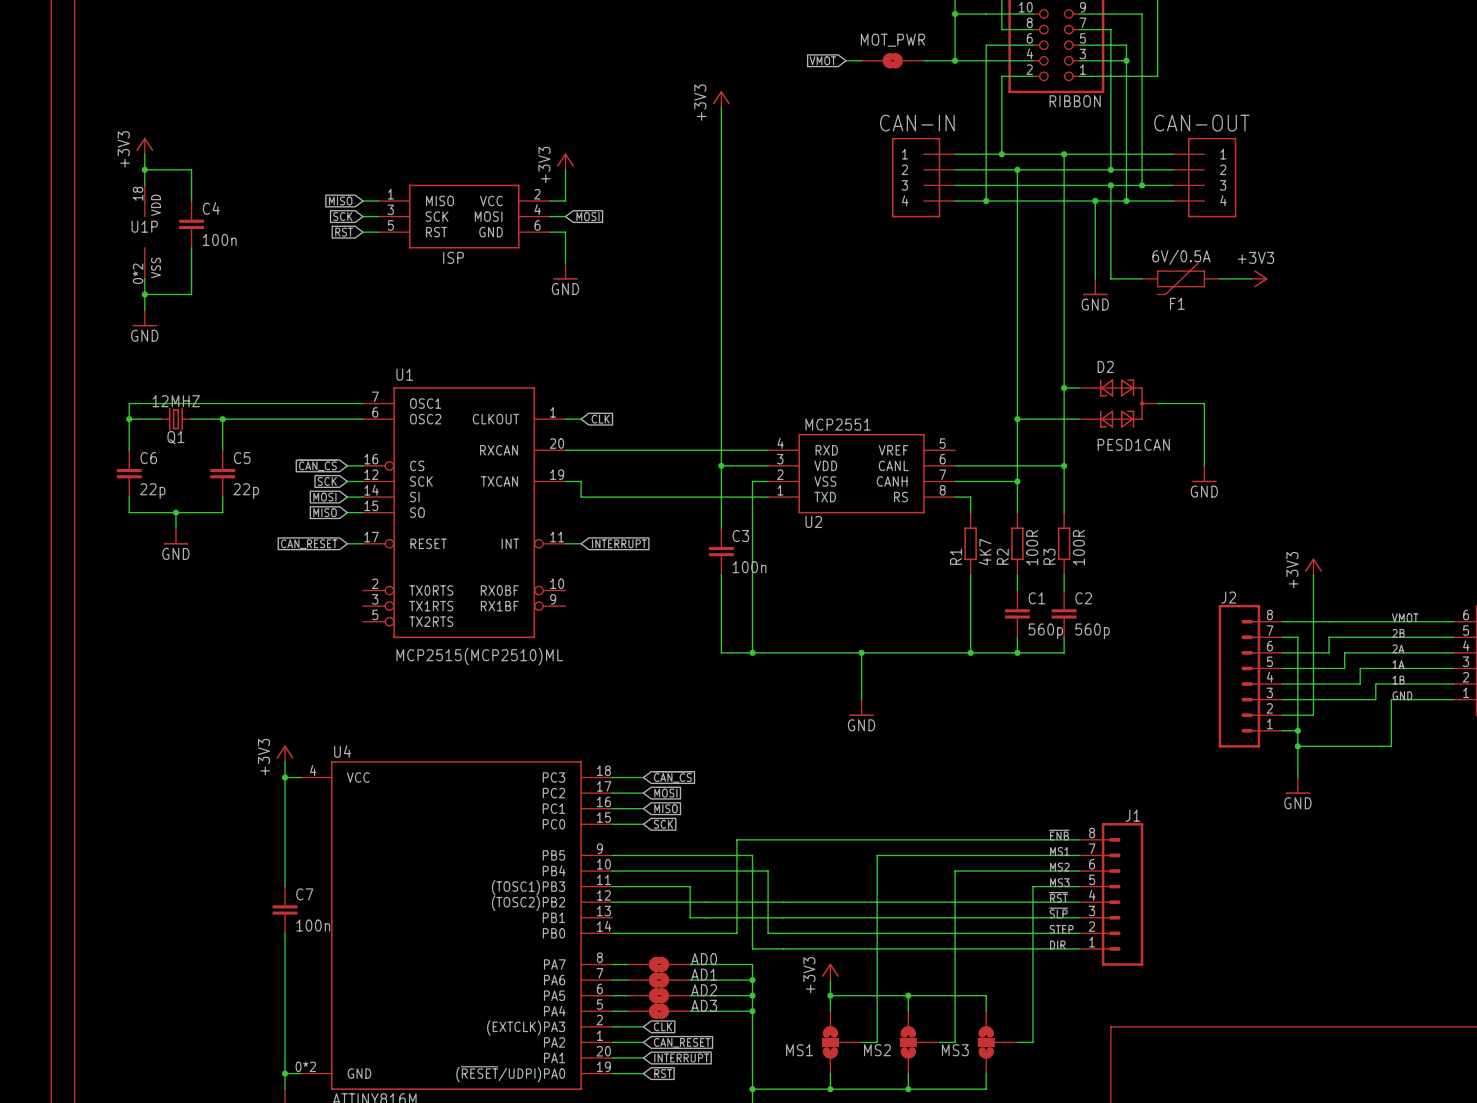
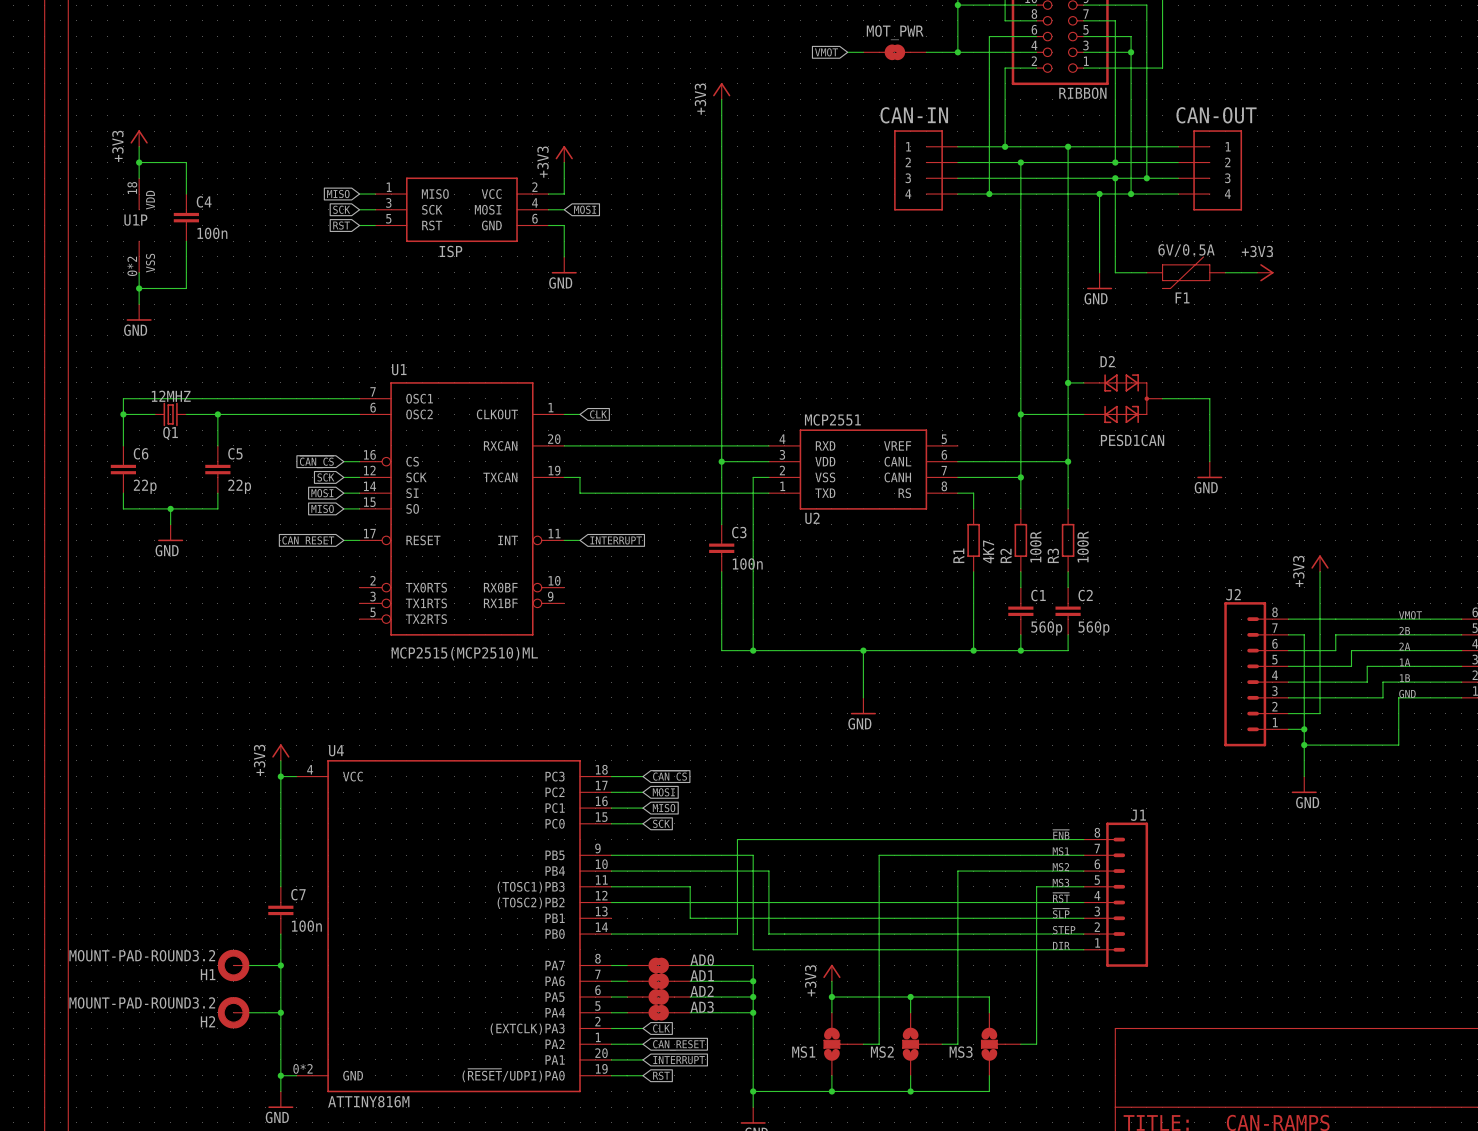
H1: none -> MOUNT-PAD-ROUND3.2 (233, 965)
wire: none -> (249, 965) (280, 965)
junction: none -> (280, 965)
H2: none -> MOUNT-PAD-ROUND3.2 (233, 1012)
wire: none -> (249, 1012) (280, 1012)
junction: none -> (280, 1012)

